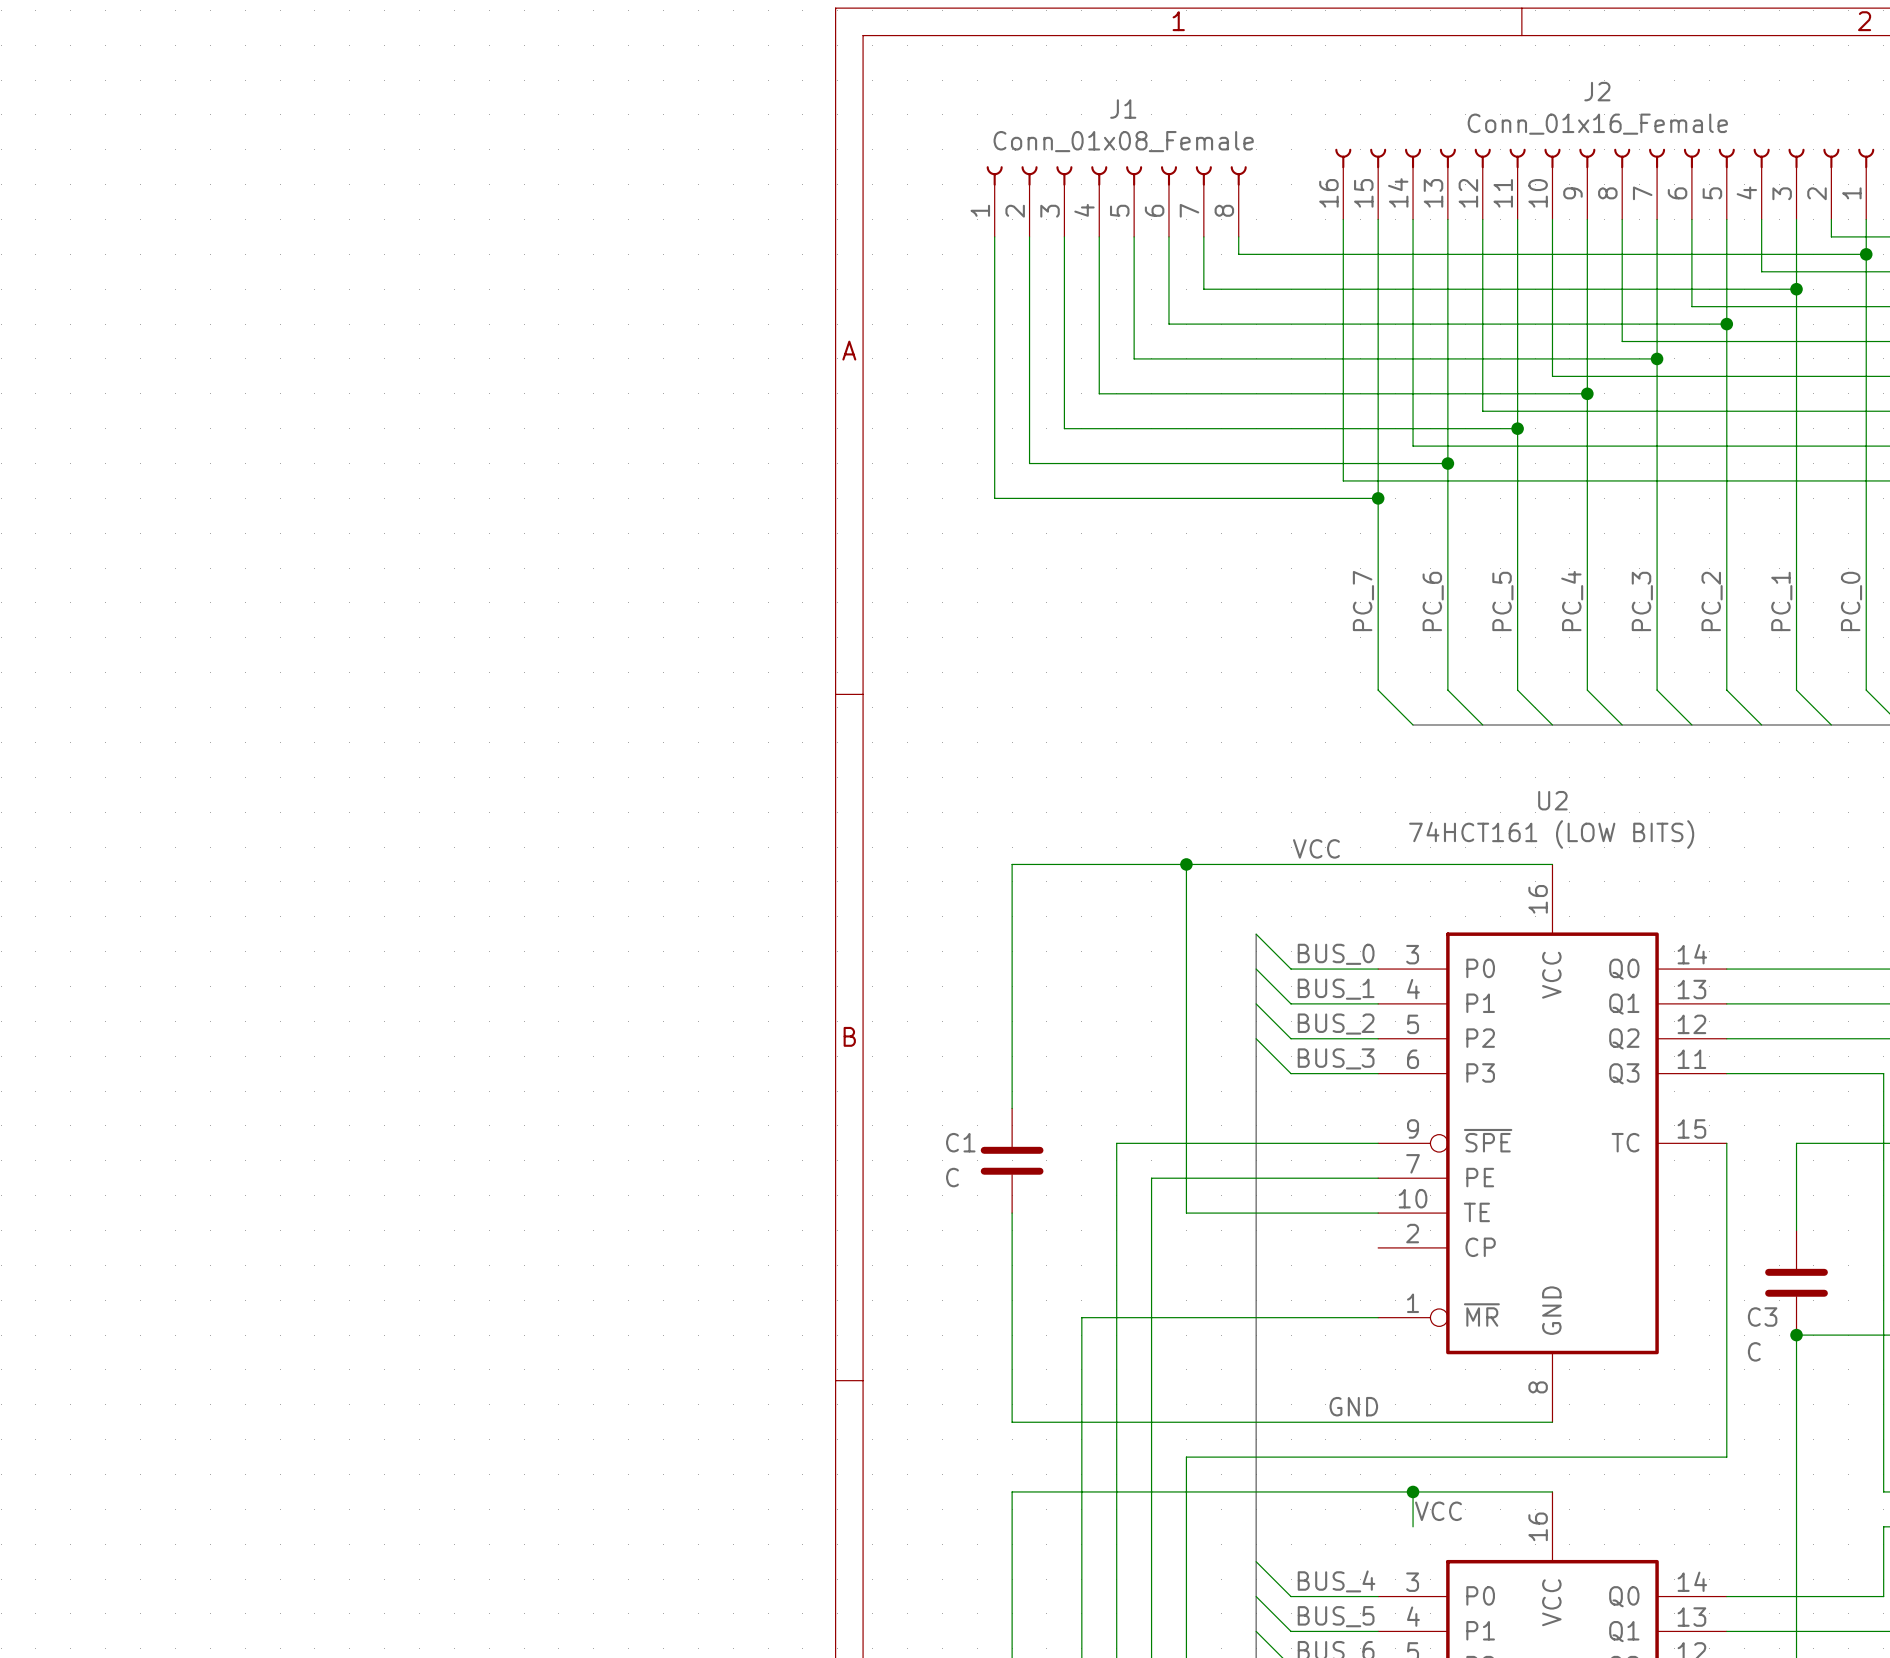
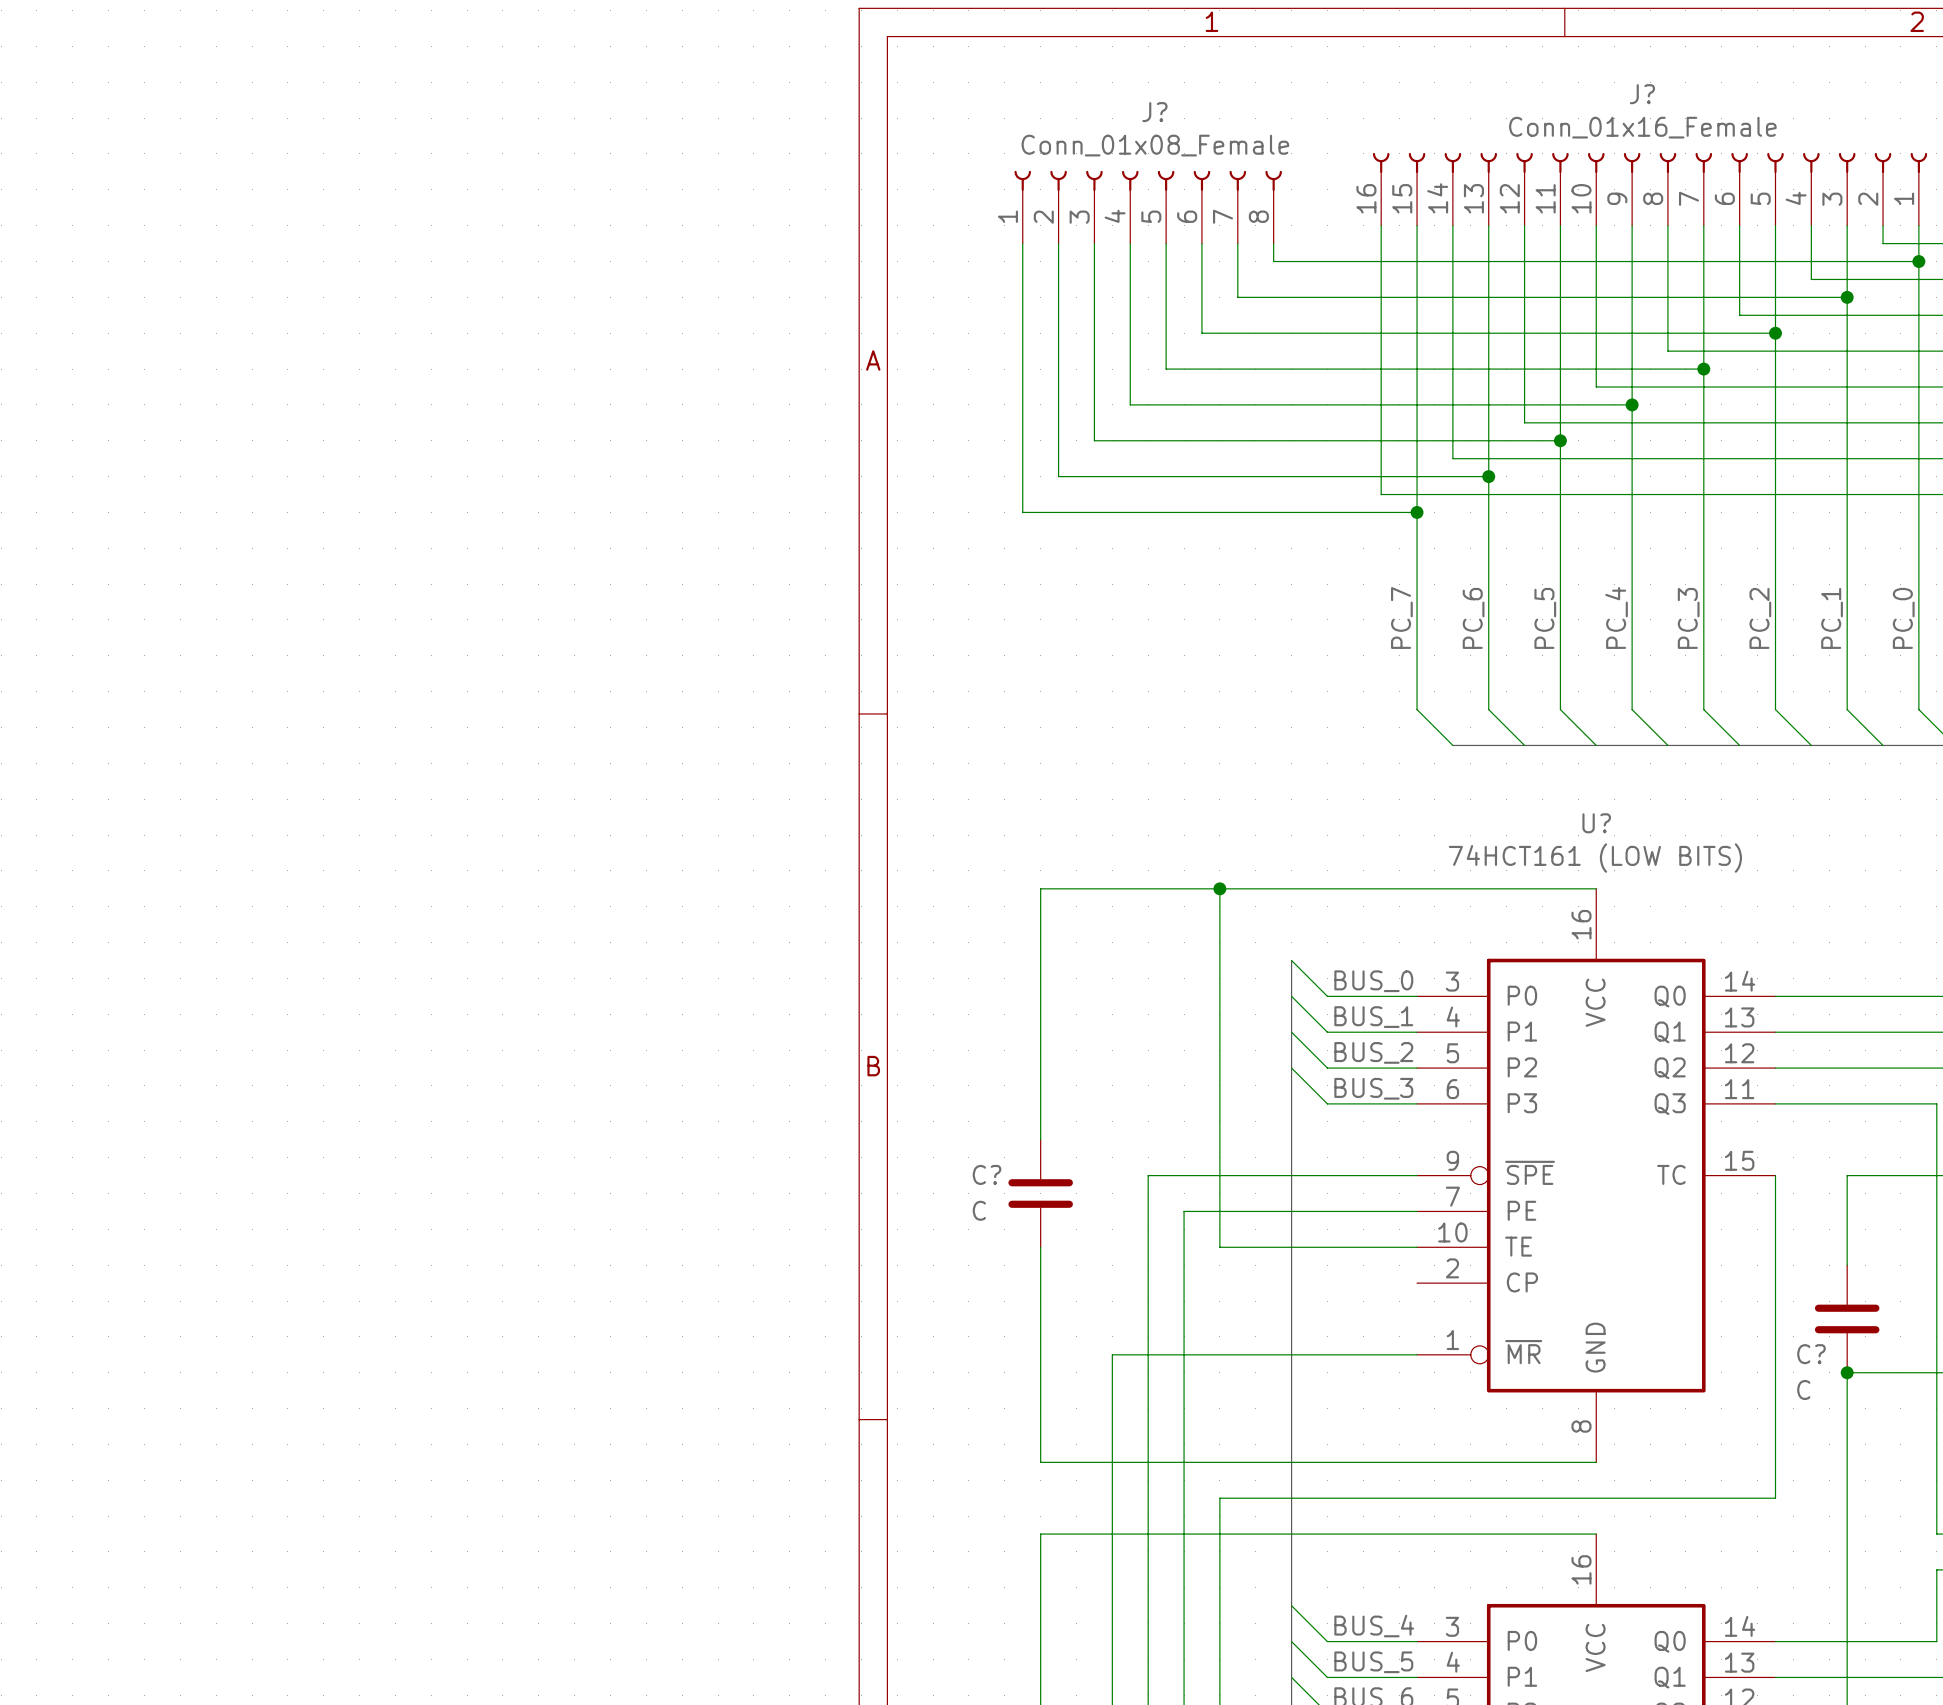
J2 name: J2 (1597, 91) -> J? (1642, 94)
J1 name: J1 (1123, 109) -> J? (1154, 112)
U2 name: U2 (1552, 800) -> U? (1596, 823)
label: VCC (1316, 848) -> none
C1 name: C1 (960, 1142) -> C? (987, 1174)
C3 name: C3 (1762, 1317) -> C? (1811, 1354)
label: GND (1353, 1406) -> none
wire: (1413, 1491) (1413, 1526) -> none
junction: (1413, 1491) -> none
label: VCC (1438, 1511) -> none

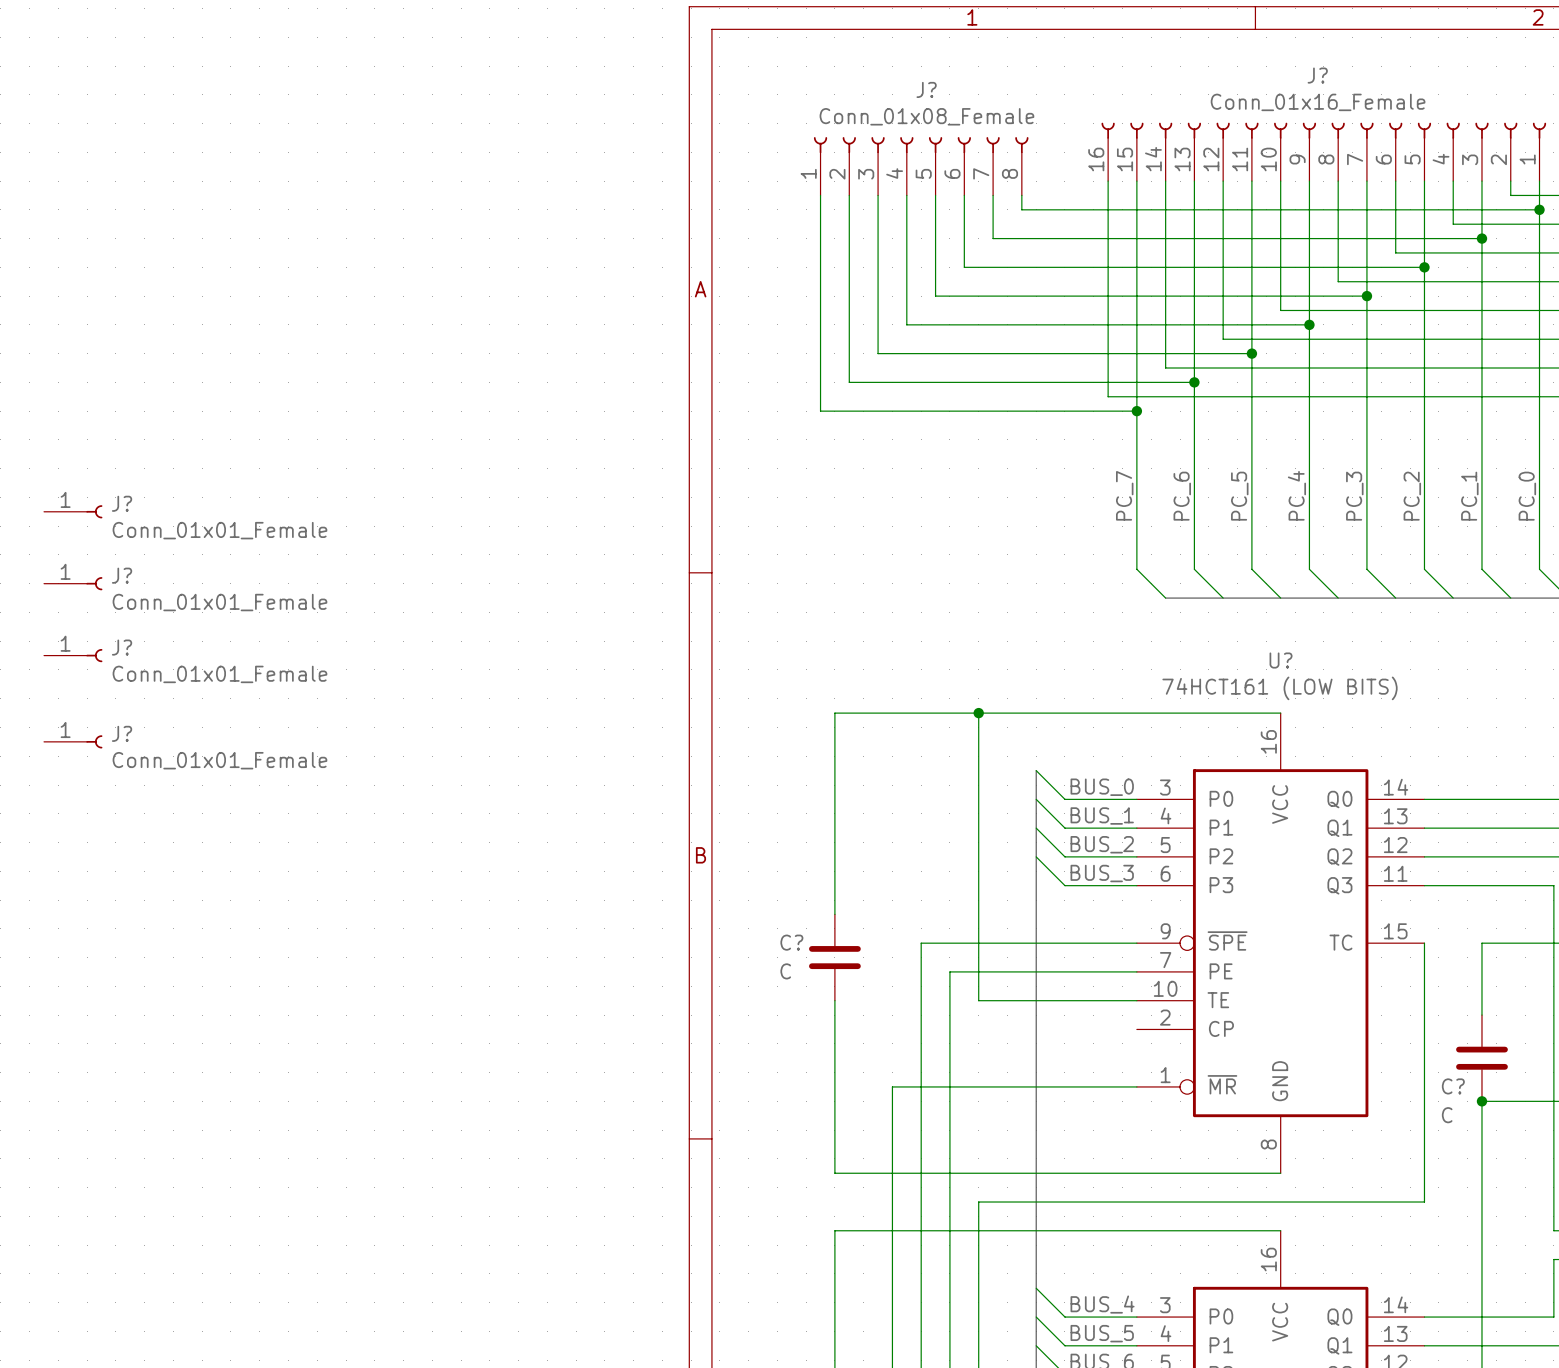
J?: none -> Conn_01x01_Female (73, 511)
J?: none -> Conn_01x01_Female (73, 583)
J?: none -> Conn_01x01_Female (73, 655)
J?: none -> Conn_01x01_Female (73, 741)

